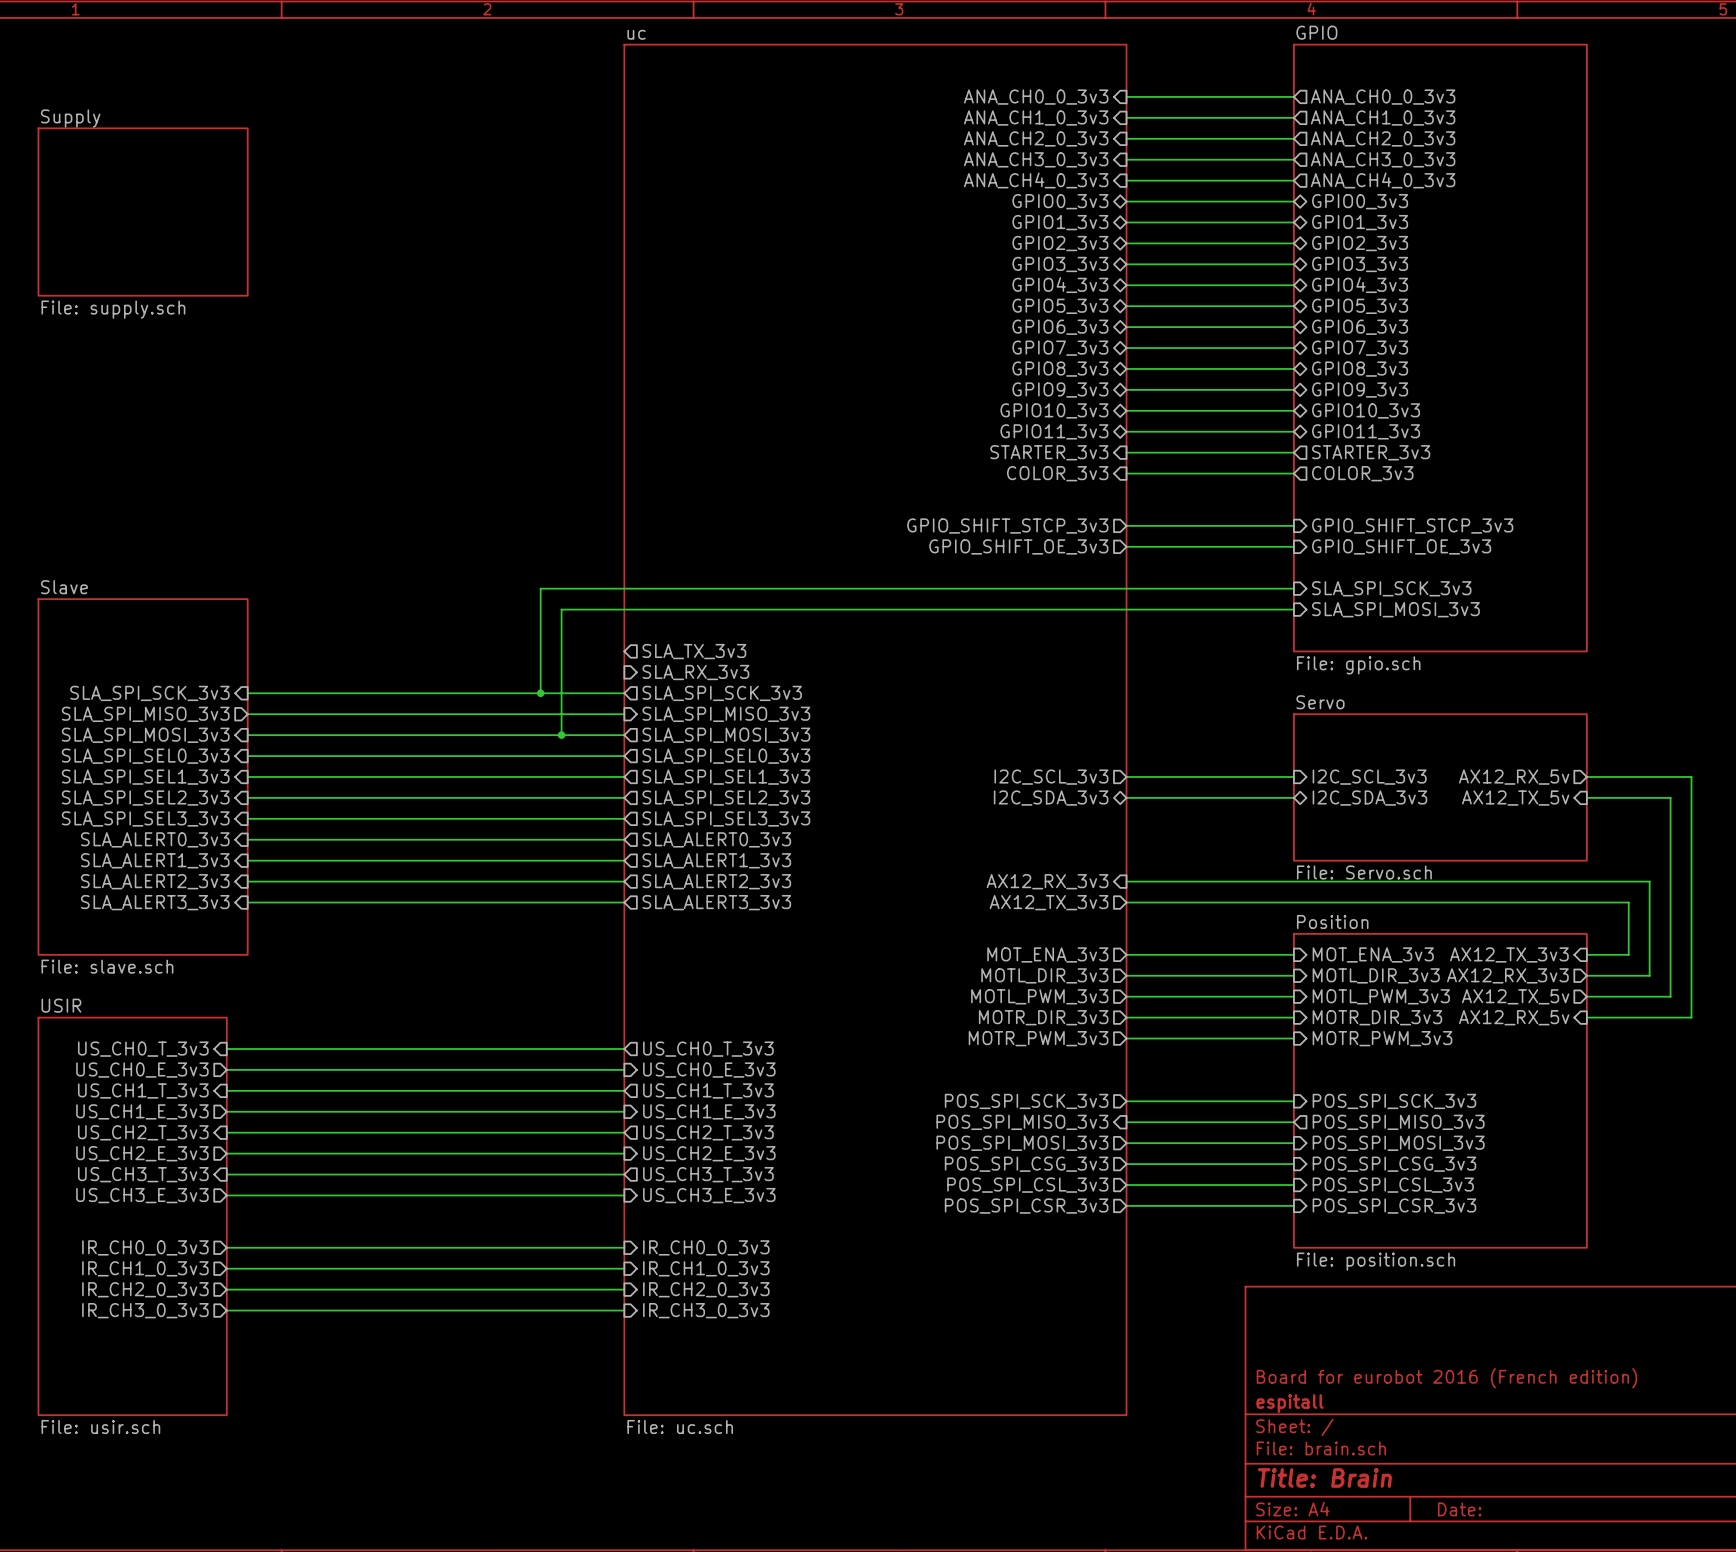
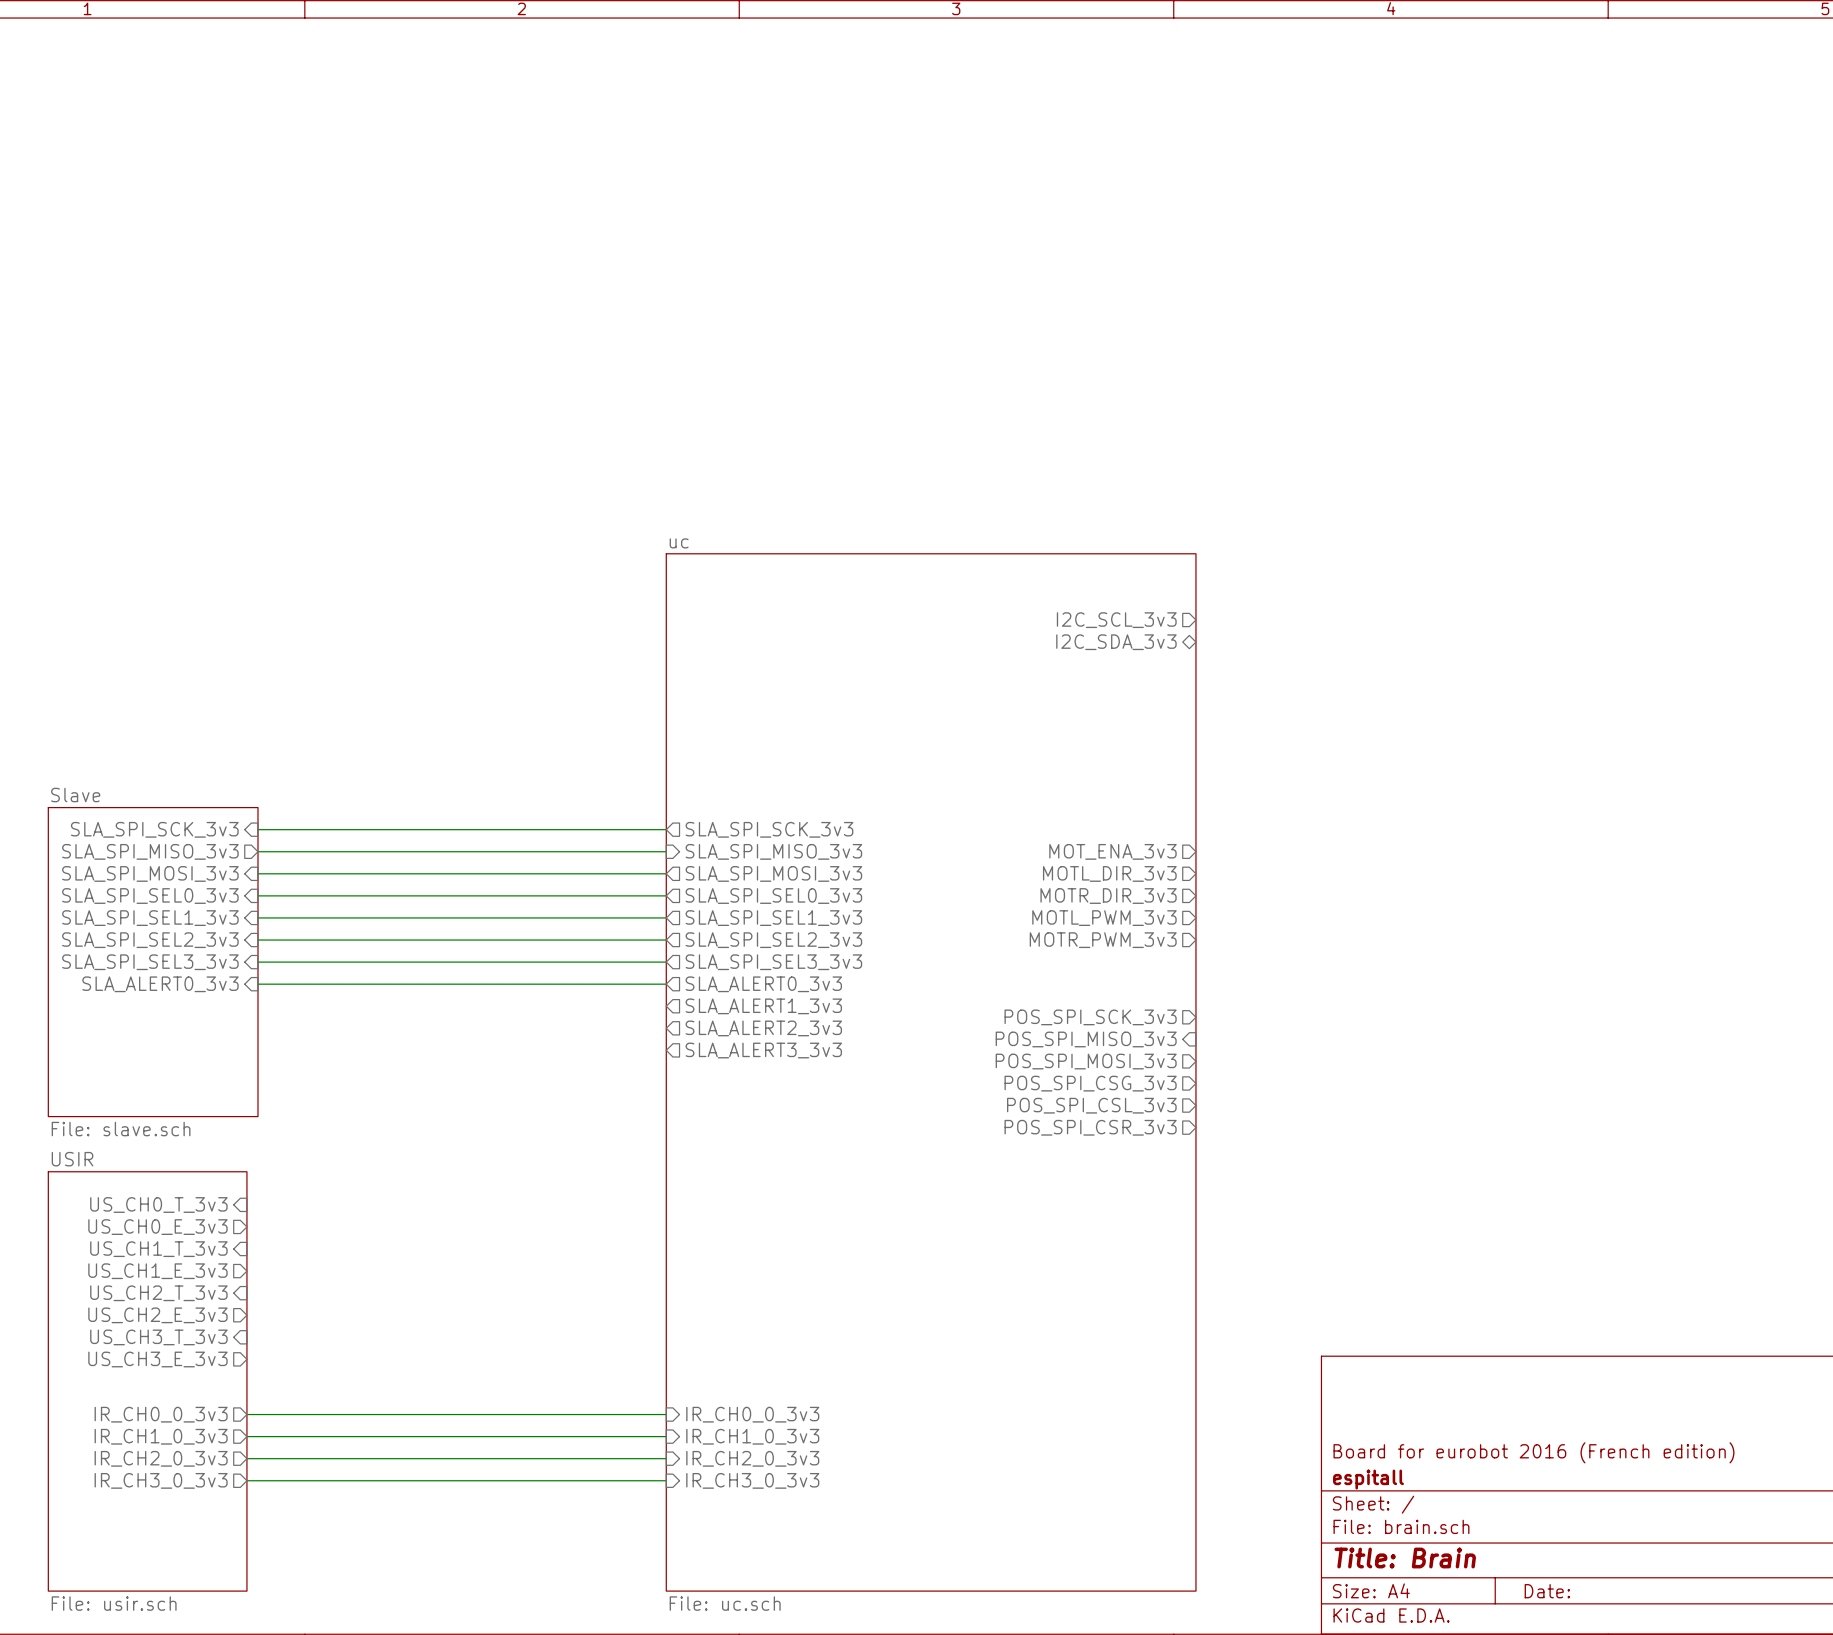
wire: (1126, 96) (1293, 96) -> none
sheet pin: ANA_CH0_0_3v3 (1036, 97) -> none
sheet pin: ANA_CH0_0_3v3 (1383, 97) -> none
wire: (1126, 117) (1293, 117) -> none
sheet pin: ANA_CH1_0_3v3 (1036, 118) -> none
sheet pin: ANA_CH1_0_3v3 (1383, 118) -> none
sheet pin: ANA_CH2_0_3v3 (1036, 138) -> none
wire: (1126, 138) (1293, 138) -> none
sheet pin: ANA_CH2_0_3v3 (1383, 138) -> none
sheet pin: ANA_CH3_0_3v3 (1036, 159) -> none
wire: (1126, 159) (1293, 159) -> none
sheet pin: ANA_CH3_0_3v3 (1383, 159) -> none
sheet pin: ANA_CH4_0_3v3 (1036, 180) -> none
wire: (1126, 180) (1293, 180) -> none
sheet pin: ANA_CH4_0_3v3 (1383, 180) -> none
sheet pin: GPIO0_3v3 (1060, 201) -> none
wire: (1126, 201) (1293, 201) -> none
sheet pin: GPIO0_3v3 (1360, 201) -> none
sheet Supply: File: supply.sch (143, 212) -> none
sheet pin: GPIO1_3v3 (1060, 222) -> none
wire: (1126, 222) (1293, 222) -> none
sheet pin: GPIO1_3v3 (1360, 222) -> none
sheet pin: GPIO2_3v3 (1060, 243) -> none
wire: (1126, 243) (1293, 243) -> none
sheet pin: GPIO2_3v3 (1360, 243) -> none
sheet pin: GPIO3_3v3 (1060, 264) -> none
wire: (1126, 264) (1293, 264) -> none
sheet pin: GPIO3_3v3 (1360, 264) -> none
sheet pin: GPIO4_3v3 (1060, 285) -> none
wire: (1126, 285) (1293, 285) -> none
sheet pin: GPIO4_3v3 (1360, 285) -> none
sheet pin: GPIO5_3v3 (1060, 306) -> none
wire: (1126, 306) (1293, 306) -> none
sheet pin: GPIO5_3v3 (1360, 306) -> none
sheet pin: GPIO6_3v3 (1060, 327) -> none
wire: (1126, 327) (1293, 327) -> none
sheet pin: GPIO6_3v3 (1360, 327) -> none
sheet pin: GPIO7_3v3 (1060, 348) -> none
wire: (1126, 348) (1293, 348) -> none
sheet pin: GPIO7_3v3 (1360, 348) -> none
sheet GPIO: File: gpio.sch (1440, 348) -> none
wire: (1126, 368) (1293, 368) -> none
sheet pin: GPIO8_3v3 (1060, 369) -> none
sheet pin: GPIO8_3v3 (1360, 369) -> none
wire: (1126, 389) (1293, 389) -> none
sheet pin: GPIO9_3v3 (1060, 390) -> none
sheet pin: GPIO9_3v3 (1360, 390) -> none
sheet pin: GPIO10_3v3 (1054, 410) -> none
wire: (1126, 410) (1293, 410) -> none
sheet pin: GPIO10_3v3 (1366, 410) -> none
sheet pin: GPIO11_3v3 (1054, 431) -> none
wire: (1126, 431) (1293, 431) -> none
sheet pin: GPIO11_3v3 (1366, 431) -> none
sheet pin: STARTER_3v3 (1049, 452) -> none
wire: (1126, 452) (1293, 452) -> none
sheet pin: STARTER_3v3 (1371, 452) -> none
sheet pin: COLOR_3v3 (1057, 473) -> none
wire: (1126, 473) (1293, 473) -> none
sheet pin: COLOR_3v3 (1362, 473) -> none
wire: (1126, 525) (1293, 525) -> none
sheet pin: GPIO_SHIFT_STCP_3v3 (1007, 526) -> none
sheet pin: GPIO_SHIFT_STCP_3v3 (1412, 526) -> none
sheet pin: GPIO_SHIFT_OE_3v3 (1018, 546) -> none
wire: (1126, 546) (1293, 546) -> none
sheet pin: GPIO_SHIFT_OE_3v3 (1401, 546) -> none
sheet pin: none -> I2C_SCL_3v3 (1116, 620)
wire: (1293, 588) (540, 588) (540, 693) -> none
sheet pin: SLA_SPI_SCK_3v3 (1391, 588) -> none
sheet pin: none -> I2C_SDA_3v3 (1116, 642)
wire: (1293, 609) (561, 609) (561, 735) -> none
sheet pin: SLA_SPI_MOSI_3v3 (1395, 609) -> none
sheet pin: SLA_TX_3v3 (694, 651) -> none
sheet pin: SLA_RX_3v3 (695, 672) -> none
sheet pin position: SLA_SPI_SCK_3v3 (149, 693) -> SLA_SPI_SCK_3v3 (154, 829)
wire: (247, 693) (624, 693) -> none
junction: (540, 693) -> none
sheet pin position: SLA_SPI_SCK_3v3 (722, 693) -> SLA_SPI_SCK_3v3 (769, 829)
sheet pin position: SLA_SPI_MISO_3v3 (145, 714) -> SLA_SPI_MISO_3v3 (150, 851)
wire: (247, 714) (624, 714) -> none
sheet pin position: SLA_SPI_MISO_3v3 (726, 714) -> SLA_SPI_MISO_3v3 (773, 851)
sheet uc: File: uc.sch (875, 729) -> none
sheet pin position: SLA_SPI_MOSI_3v3 (145, 735) -> SLA_SPI_MOSI_3v3 (150, 873)
wire: (247, 735) (624, 735) -> none
junction: (561, 735) -> none
sheet pin position: SLA_SPI_MOSI_3v3 (726, 735) -> SLA_SPI_MOSI_3v3 (773, 873)
sheet pin position: SLA_SPI_SEL0_3v3 (145, 756) -> SLA_SPI_SEL0_3v3 (150, 896)
wire: (247, 756) (624, 756) -> none
sheet pin position: SLA_SPI_SEL0_3v3 (726, 756) -> SLA_SPI_SEL0_3v3 (773, 896)
sheet Slave: File: slave.sch (143, 776) -> none
wire: (247, 776) (624, 776) -> none
wire: (1126, 776) (1293, 776) -> none
wire: (1586, 776) (1691, 776) (1691, 1017) (1586, 1017) -> none
sheet pin position: SLA_SPI_SEL1_3v3 (145, 777) -> SLA_SPI_SEL1_3v3 (150, 918)
sheet pin position: SLA_SPI_SEL1_3v3 (726, 777) -> SLA_SPI_SEL1_3v3 (773, 918)
sheet pin: I2C_SCL_3v3 (1051, 777) -> none
sheet pin: I2C_SCL_3v3 (1369, 777) -> none
sheet pin: AX12_RX_5v (1514, 777) -> none
wire: none -> (257, 829) (666, 829)
sheet Servo: File: Servo.sch (1440, 787) -> none
wire: (247, 797) (624, 797) -> none
wire: (1126, 797) (1293, 797) -> none
wire: (1586, 797) (1670, 797) (1670, 996) (1586, 996) -> none
sheet pin position: SLA_SPI_SEL2_3v3 (145, 798) -> SLA_SPI_SEL2_3v3 (150, 940)
sheet pin position: SLA_SPI_SEL2_3v3 (726, 798) -> SLA_SPI_SEL2_3v3 (773, 940)
sheet pin: I2C_SDA_3v3 (1051, 798) -> none
sheet pin: I2C_SDA_3v3 (1369, 798) -> none
sheet pin: AX12_TX_5v (1515, 798) -> none
wire: none -> (257, 851) (666, 851)
sheet pin: none -> MOT_ENA_3v3 (1112, 851)
sheet pin position: SLA_SPI_SEL3_3v3 (145, 818) -> SLA_SPI_SEL3_3v3 (150, 962)
wire: (247, 818) (624, 818) -> none
sheet pin position: SLA_SPI_SEL3_3v3 (726, 818) -> SLA_SPI_SEL3_3v3 (773, 962)
wire: none -> (257, 873) (666, 873)
sheet pin: none -> MOTL_DIR_3v3 (1109, 873)
sheet pin position: SLA_ALERT0_3v3 (155, 839) -> SLA_ALERT0_3v3 (160, 984)
wire: (247, 839) (624, 839) -> none
sheet pin position: SLA_ALERT0_3v3 (716, 839) -> SLA_ALERT0_3v3 (763, 984)
wire: none -> (257, 895) (666, 895)
sheet pin: none -> MOTR_DIR_3v3 (1108, 896)
sheet pin: SLA_ALERT1_3v3 (155, 860) -> none
wire: (247, 860) (624, 860) -> none
sheet pin position: SLA_ALERT1_3v3 (716, 860) -> SLA_ALERT1_3v3 (763, 1006)
wire: none -> (257, 917) (666, 917)
sheet pin: none -> MOTL_PWM_3v3 (1104, 918)
sheet pin: SLA_ALERT2_3v3 (155, 881) -> none
wire: (247, 881) (624, 881) -> none
sheet pin position: SLA_ALERT2_3v3 (716, 881) -> SLA_ALERT2_3v3 (763, 1028)
sheet pin: AX12_RX_3v3 (1047, 881) -> none
wire: (1126, 881) (1649, 881) (1649, 975) (1586, 975) -> none
wire: none -> (257, 940) (666, 940)
sheet pin: none -> MOTR_PWM_3v3 (1103, 940)
sheet pin: SLA_ALERT3_3v3 (155, 902) -> none
wire: (247, 902) (624, 902) -> none
sheet pin position: SLA_ALERT3_3v3 (716, 902) -> SLA_ALERT3_3v3 (763, 1050)
sheet pin: AX12_TX_3v3 (1049, 902) -> none
wire: (1126, 902) (1628, 902) (1628, 954) (1586, 954) -> none
sheet Slave: none -> File: slave.sch (153, 962)
wire: none -> (257, 962) (666, 962)
wire: none -> (257, 984) (666, 984)
sheet pin: MOT_ENA_3v3 (1047, 954) -> none
wire: (1126, 954) (1293, 954) -> none
sheet pin: MOT_ENA_3v3 (1373, 954) -> none
sheet pin: AX12_TX_3v3 (1509, 954) -> none
sheet pin: none -> POS_SPI_SCK_3v3 (1090, 1017)
sheet pin: MOTL_DIR_3v3 (1044, 975) -> none
wire: (1126, 975) (1293, 975) -> none
sheet pin: MOTL_DIR_3v3 (1376, 975) -> none
sheet pin: AX12_RX_3v3 (1507, 975) -> none
sheet pin: none -> POS_SPI_MISO_3v3 (1086, 1039)
sheet pin: MOTL_PWM_3v3 (1039, 996) -> none
wire: (1126, 996) (1293, 996) -> none
sheet pin: MOTL_PWM_3v3 (1381, 996) -> none
sheet pin: AX12_TX_5v (1515, 996) -> none
sheet pin: none -> POS_SPI_MOSI_3v3 (1086, 1061)
sheet uc: none -> File: uc.sch (931, 1072)
sheet pin: MOTR_DIR_3v3 (1043, 1017) -> none
wire: (1126, 1017) (1293, 1017) -> none
sheet pin: MOTR_DIR_3v3 (1377, 1017) -> none
sheet pin: AX12_RX_5v (1514, 1017) -> none
sheet pin: none -> POS_SPI_CSG_3v3 (1090, 1083)
sheet pin: MOTR_PWM_3v3 (1038, 1038) -> none
wire: (1126, 1038) (1293, 1038) -> none
sheet pin: MOTR_PWM_3v3 (1382, 1038) -> none
sheet pin position: US_CH0_T_3v3 (143, 1049) -> US_CH0_T_3v3 (158, 1205)
wire: (226, 1049) (624, 1049) -> none
sheet pin: US_CH0_T_3v3 (708, 1049) -> none
sheet pin: none -> POS_SPI_CSL_3v3 (1091, 1105)
wire: (226, 1069) (624, 1069) -> none
sheet pin position: US_CH0_E_3v3 (142, 1070) -> US_CH0_E_3v3 (157, 1227)
sheet pin: US_CH0_E_3v3 (709, 1070) -> none
sheet pin: none -> POS_SPI_CSR_3v3 (1090, 1127)
sheet pin position: US_CH1_T_3v3 (143, 1090) -> US_CH1_T_3v3 (158, 1249)
wire: (226, 1090) (624, 1090) -> none
sheet pin: US_CH1_T_3v3 (708, 1090) -> none
sheet Position: File: position.sch (1440, 1090) -> none
sheet pin: POS_SPI_SCK_3v3 (1026, 1101) -> none
wire: (1126, 1101) (1293, 1101) -> none
sheet pin: POS_SPI_SCK_3v3 (1394, 1101) -> none
sheet pin position: US_CH1_E_3v3 (142, 1111) -> US_CH1_E_3v3 (157, 1271)
wire: (226, 1111) (624, 1111) -> none
sheet pin: US_CH1_E_3v3 (709, 1111) -> none
sheet pin: POS_SPI_MISO_3v3 (1022, 1122) -> none
wire: (1126, 1122) (1293, 1122) -> none
sheet pin: POS_SPI_MISO_3v3 (1398, 1122) -> none
sheet pin position: US_CH2_T_3v3 (143, 1132) -> US_CH2_T_3v3 (158, 1293)
wire: (226, 1132) (624, 1132) -> none
sheet pin: US_CH2_T_3v3 (708, 1132) -> none
sheet pin: POS_SPI_MOSI_3v3 (1022, 1143) -> none
wire: (1126, 1143) (1293, 1143) -> none
sheet pin: POS_SPI_MOSI_3v3 (1398, 1143) -> none
sheet pin: US_CH2_E_3v3 (142, 1153) -> none
wire: (226, 1153) (624, 1153) -> none
sheet pin: US_CH2_E_3v3 (709, 1153) -> none
sheet pin: POS_SPI_CSG_3v3 (1026, 1164) -> none
wire: (1126, 1164) (1293, 1164) -> none
sheet pin: POS_SPI_CSG_3v3 (1394, 1164) -> none
sheet pin: US_CH3_T_3v3 (143, 1174) -> none
wire: (226, 1174) (624, 1174) -> none
sheet pin: US_CH3_T_3v3 (708, 1174) -> none
sheet pin: POS_SPI_CSL_3v3 (1027, 1185) -> none
wire: (1126, 1185) (1293, 1185) -> none
sheet pin: POS_SPI_CSL_3v3 (1393, 1185) -> none
sheet pin: US_CH3_E_3v3 (142, 1195) -> none
wire: (226, 1195) (624, 1195) -> none
sheet pin: US_CH3_E_3v3 (709, 1195) -> none
wire: (1126, 1205) (1293, 1205) -> none
sheet pin: POS_SPI_CSR_3v3 (1026, 1206) -> none
sheet pin: POS_SPI_CSR_3v3 (1394, 1206) -> none
sheet USIR position: (132, 1216) -> (147, 1381)
sheet pin: IR_CH0_0_3v3 (145, 1247) -> US_CH2_E_3v3 (157, 1315)
wire: (226, 1247) (624, 1247) -> (246, 1414) (666, 1414)
sheet pin position: IR_CH0_0_3v3 (706, 1247) -> IR_CH0_0_3v3 (752, 1414)
sheet pin shape: output (145, 1268) -> input (158, 1337)
sheet pin: IR_CH1_0_3v3 (145, 1268) -> US_CH3_T_3v3 (158, 1337)
wire: (226, 1268) (624, 1268) -> (246, 1436) (666, 1436)
sheet pin position: IR_CH1_0_3v3 (706, 1268) -> IR_CH1_0_3v3 (752, 1436)
sheet pin: IR_CH2_0_3v3 (145, 1289) -> US_CH3_E_3v3 (157, 1359)
wire: (226, 1289) (624, 1289) -> (246, 1458) (666, 1458)
sheet pin position: IR_CH2_0_3v3 (706, 1289) -> IR_CH2_0_3v3 (752, 1458)
sheet pin position: IR_CH3_0_3v3 (145, 1310) -> IR_CH3_0_3v3 (161, 1480)
wire: (226, 1310) (624, 1310) -> (246, 1480) (666, 1480)
sheet pin position: IR_CH3_0_3v3 (706, 1310) -> IR_CH3_0_3v3 (752, 1480)
sheet pin: none -> IR_CH0_0_3v3 (161, 1414)
sheet pin: none -> IR_CH1_0_3v3 (161, 1436)
sheet pin: none -> IR_CH2_0_3v3 (161, 1458)

